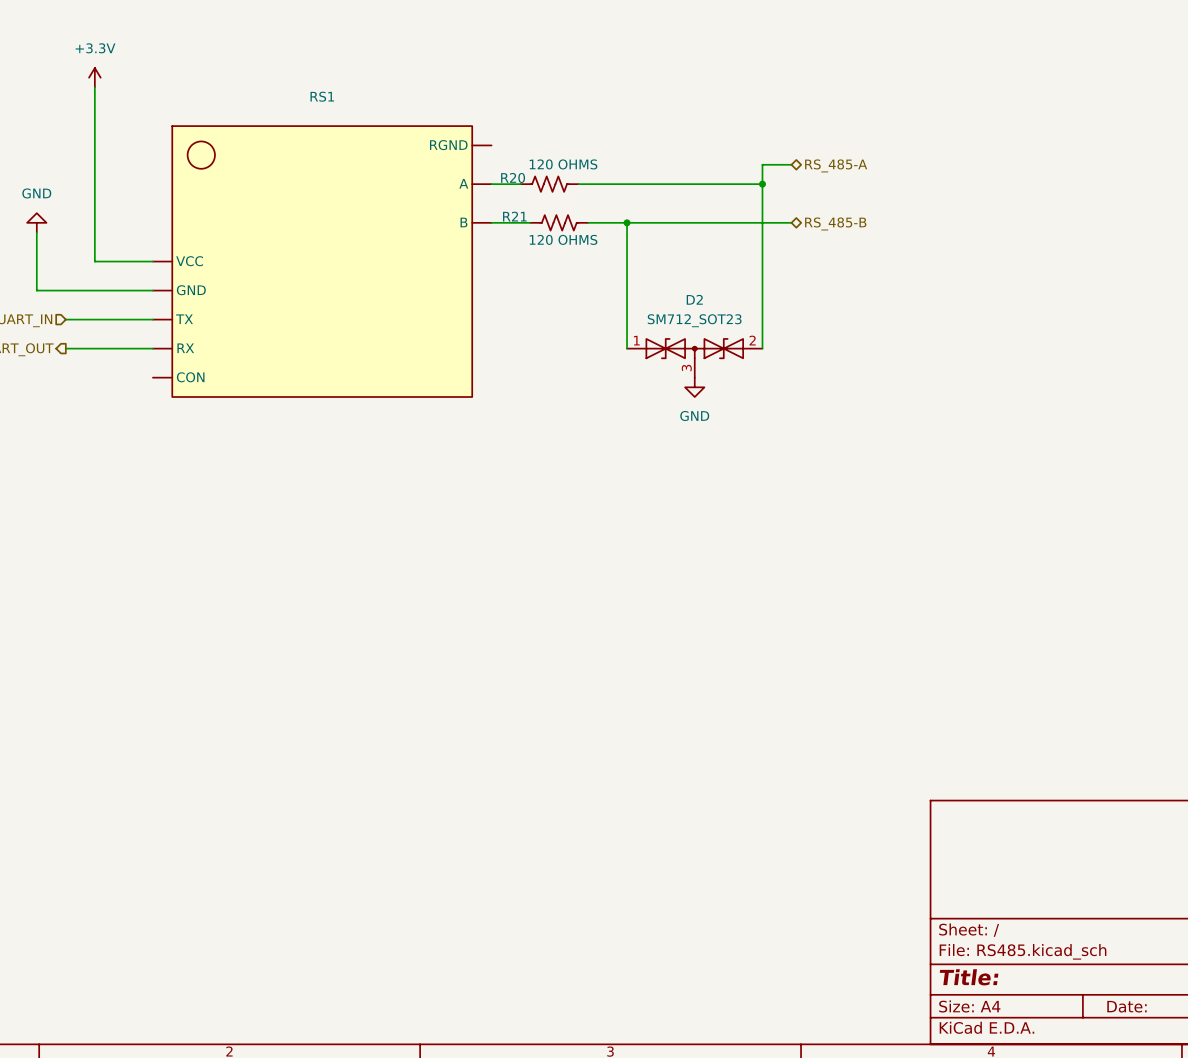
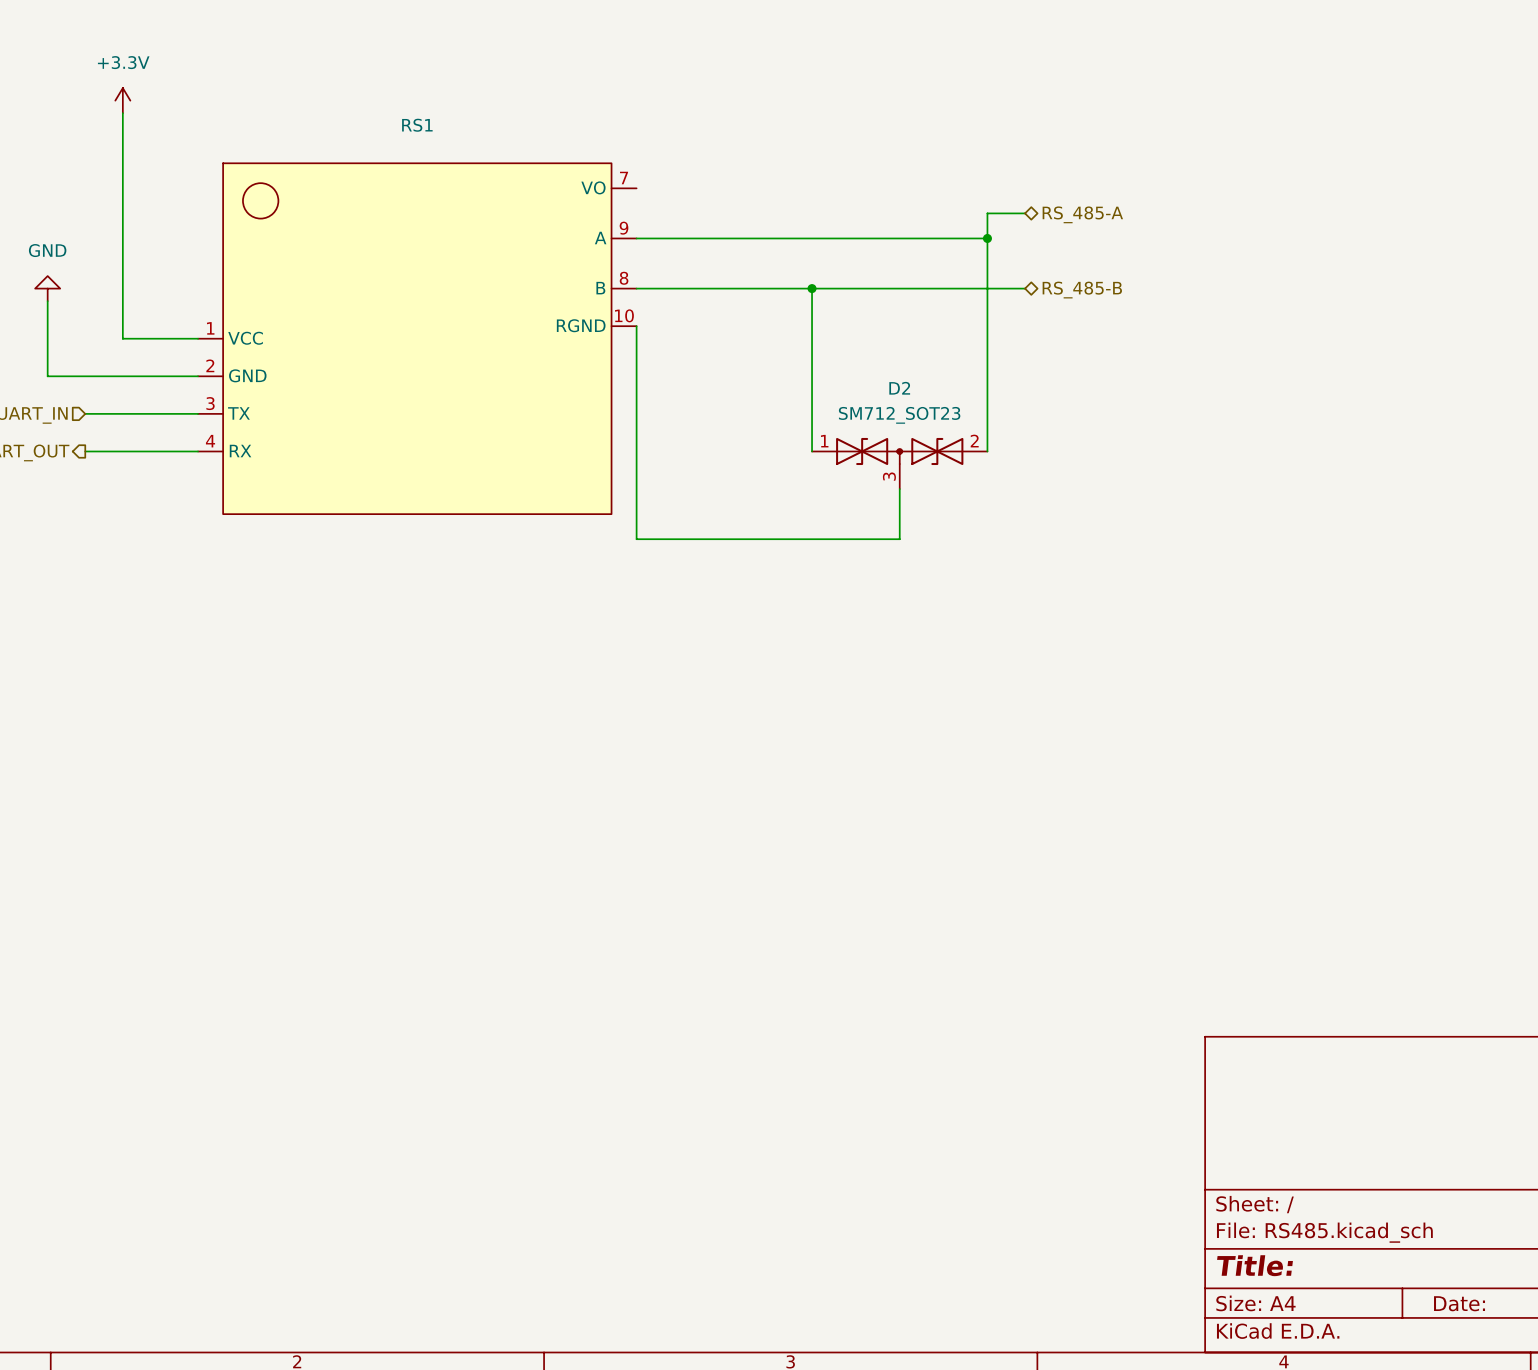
RS1 symbol: [152, 126, 492, 398] -> [198, 163, 637, 515]
R20: 120 OHMS (549, 184) -> none
R21: 120 OHMS (559, 222) -> none
wire: none -> (636, 326) (636, 539) (899, 539) (899, 489)
power symbol: GND (694, 387) -> none

